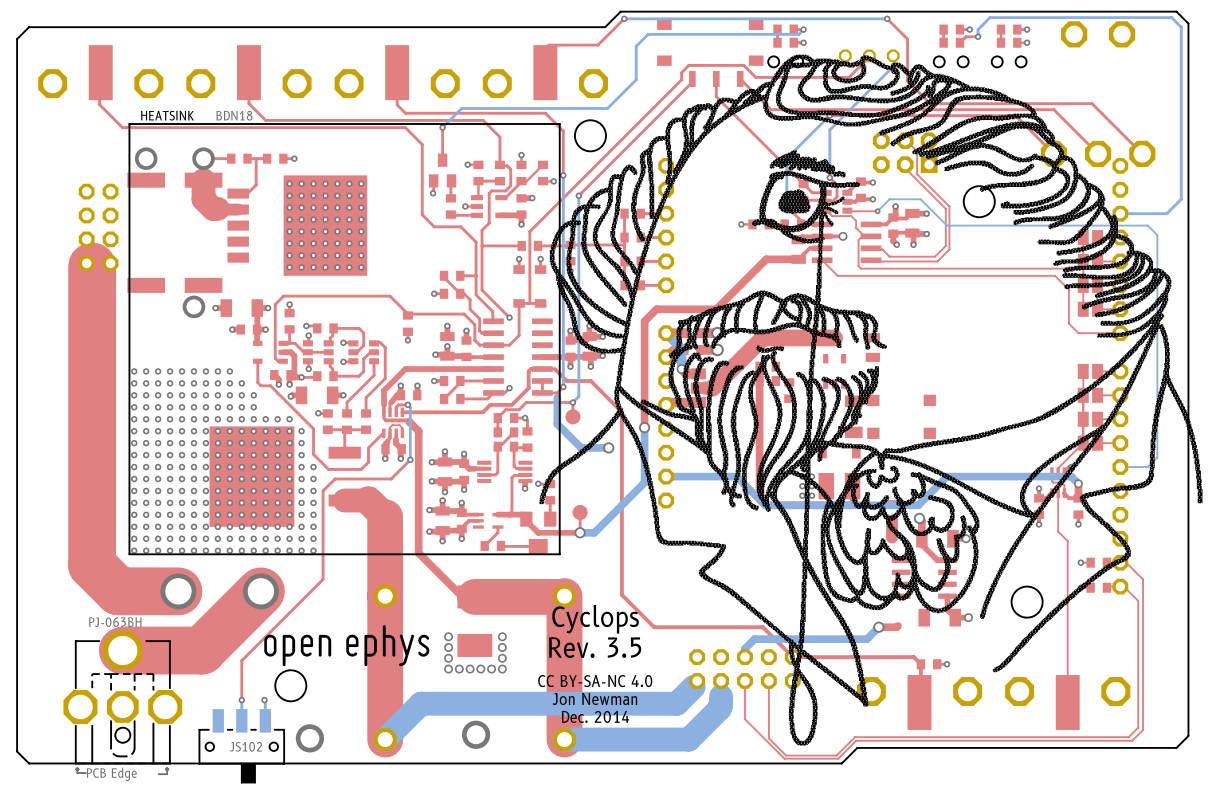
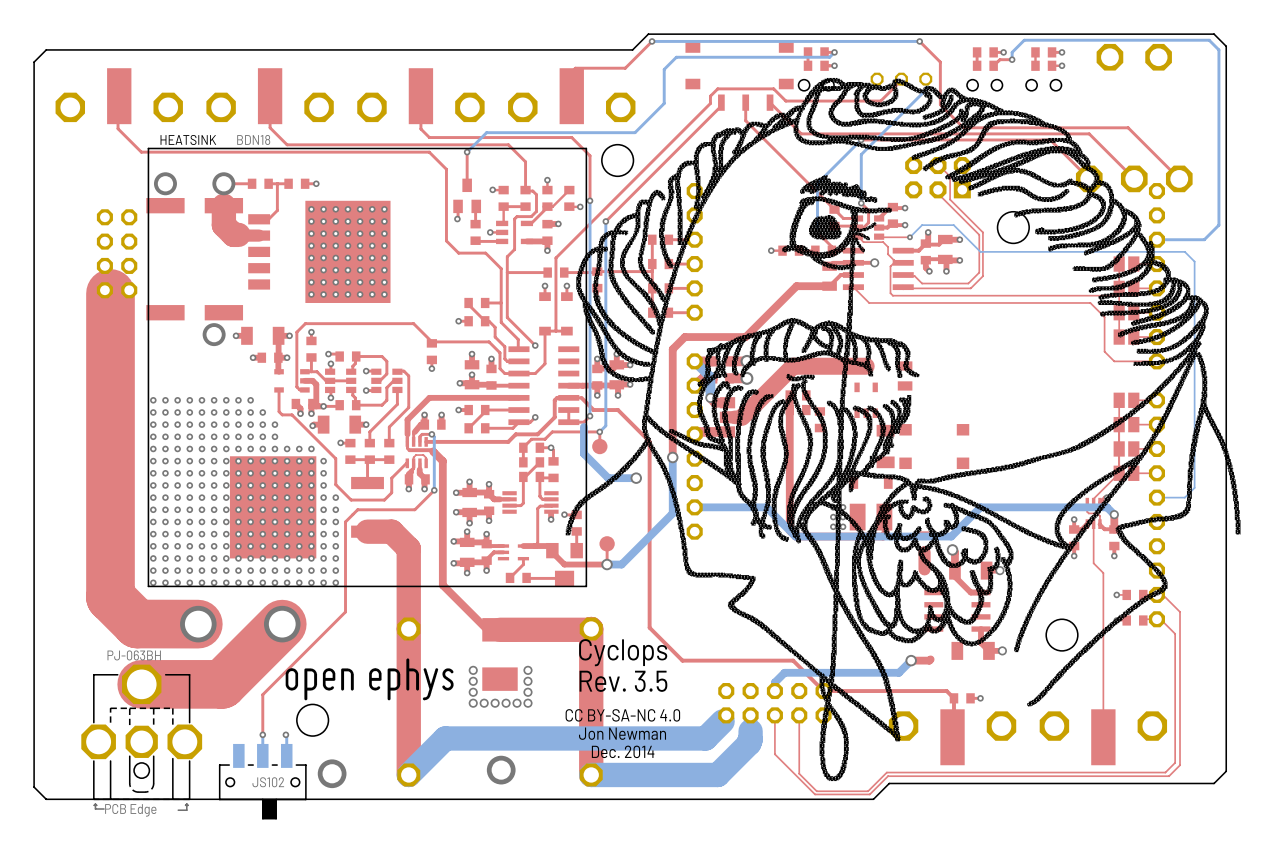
top track width: thick (368, 500) (385, 517) (385, 739) -> thin (391, 531) (408, 548) (408, 774)
top track width: thick (563, 596) (474, 596) -> thin (590, 629) (500, 629)
top track width: thick (564, 596) (564, 739) -> thin (591, 629) (591, 774)

